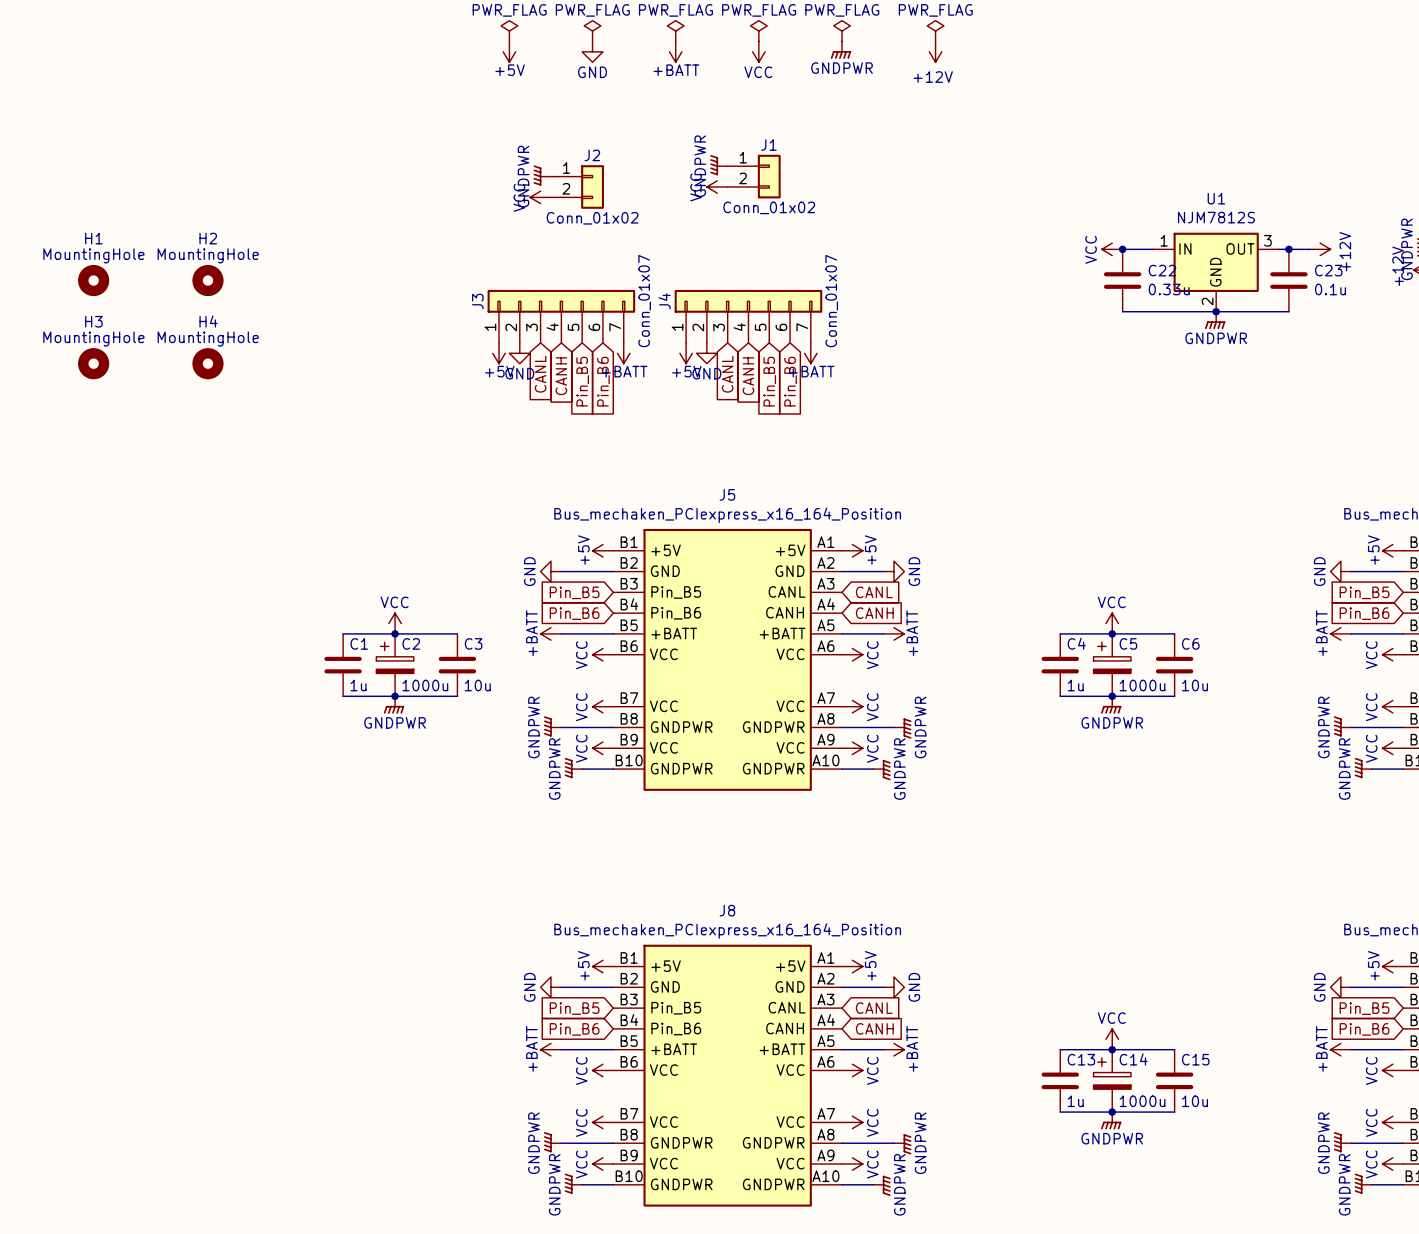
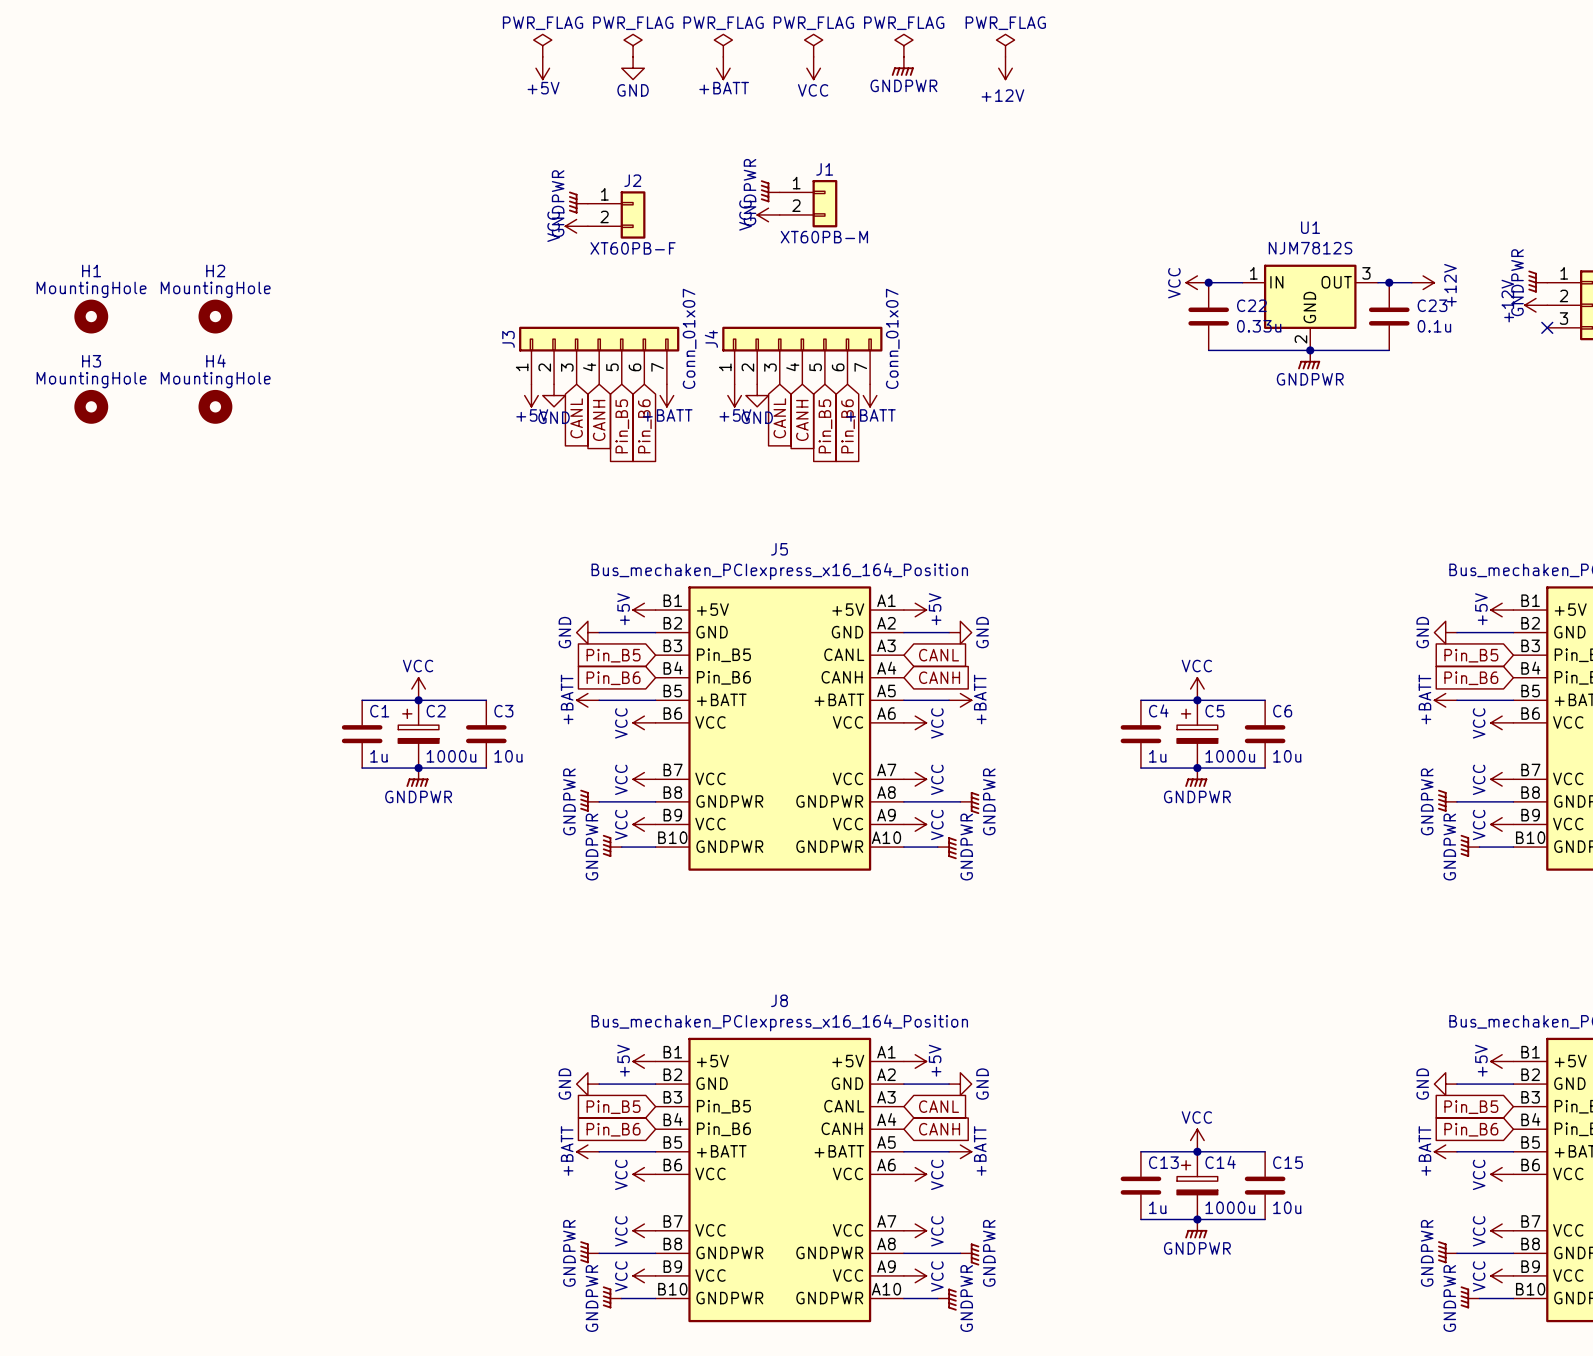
J1 value: Conn_01x02 (769, 207) -> XT60PB-M (824, 237)
J2 value: Conn_01x02 (592, 218) -> XT60PB-F (633, 248)

